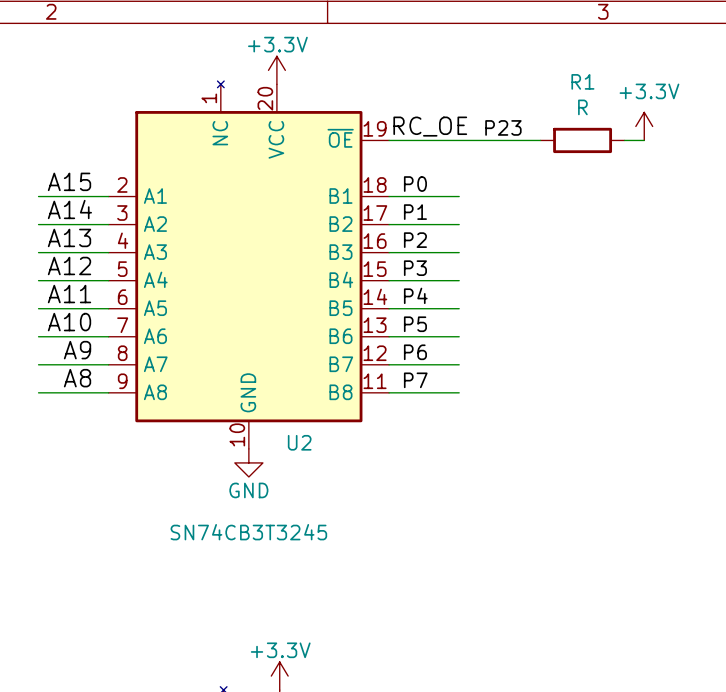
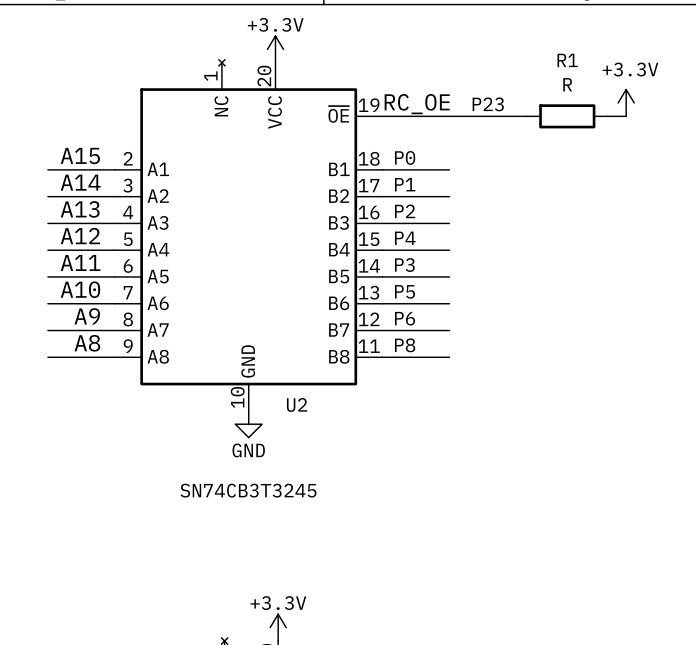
label: P3 (415, 268) -> P4 (405, 238)
label: P4 (415, 295) -> P3 (404, 265)
label: P7 (415, 380) -> P8 (405, 345)

